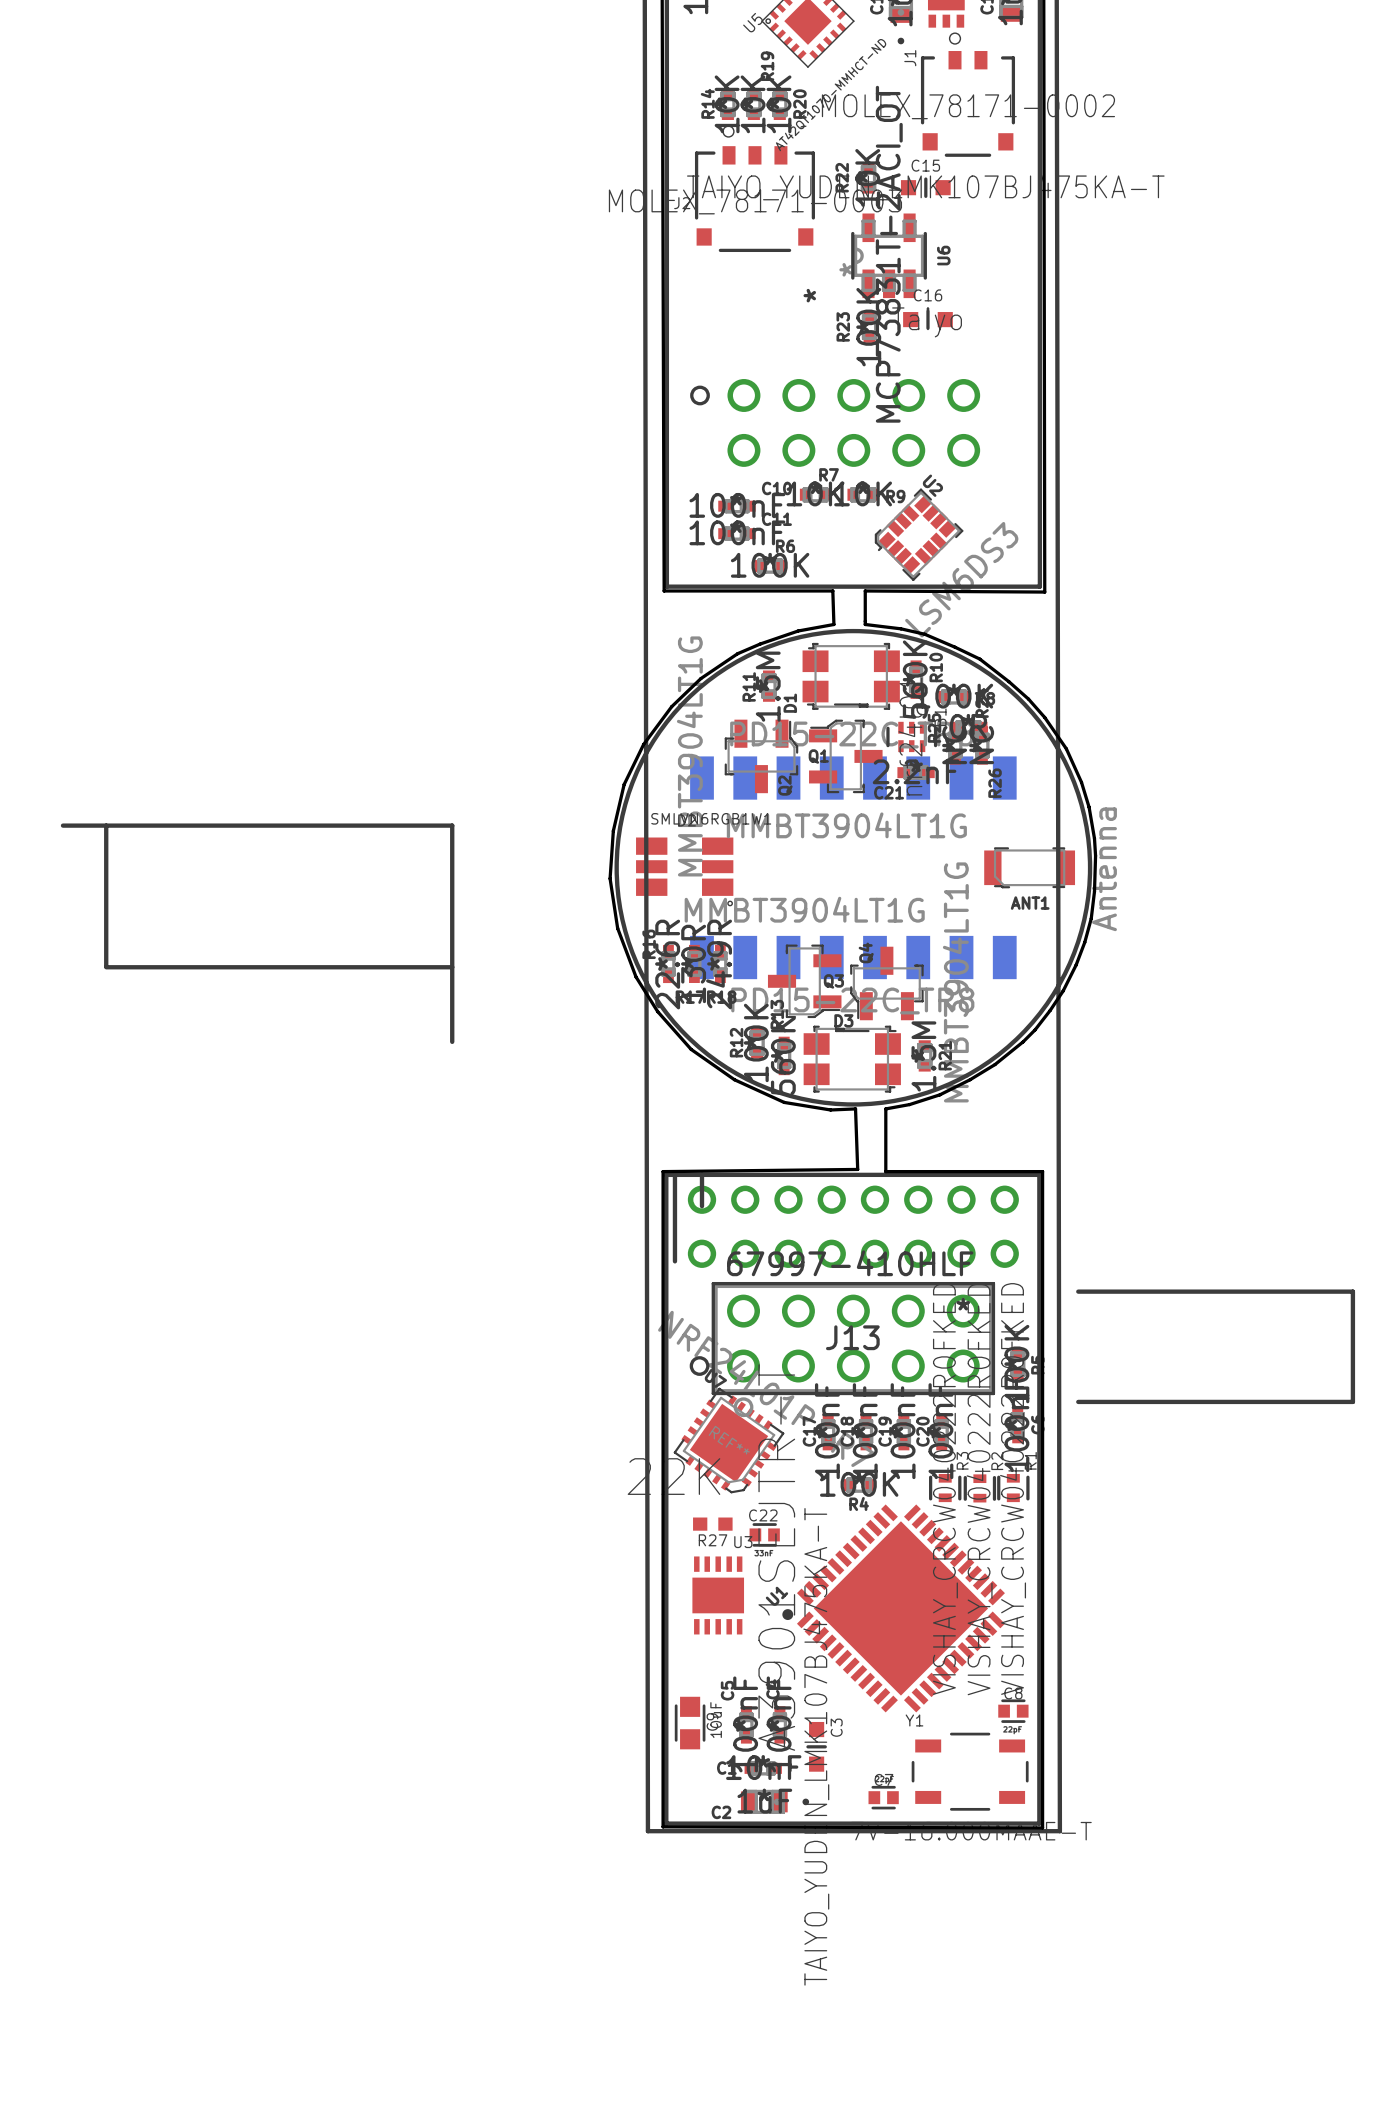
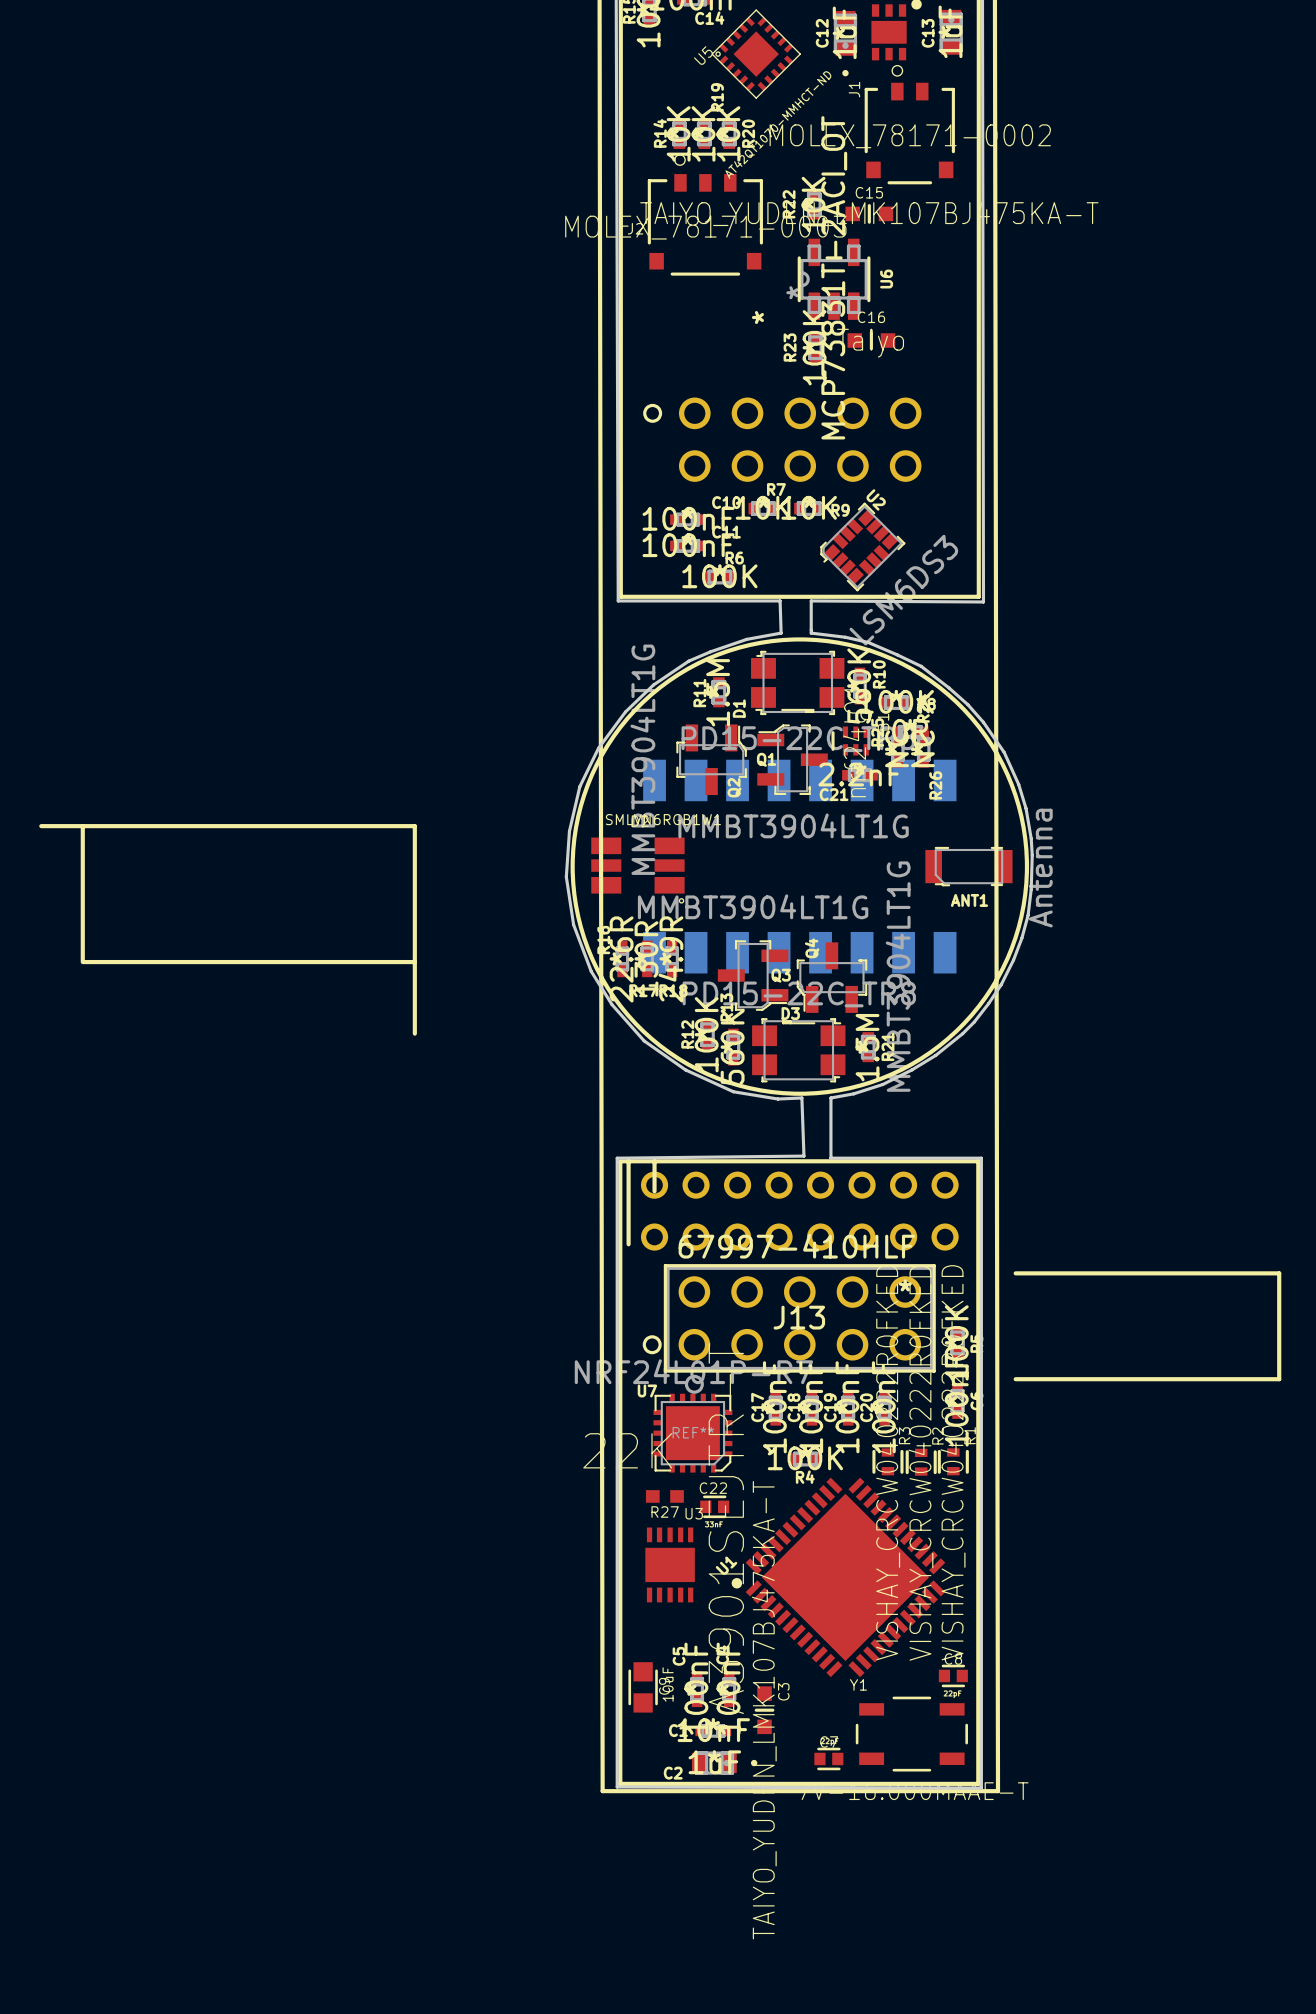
U7 rotation: 0° (729, 1440) -> 35° counterclockwise (692, 1433)

